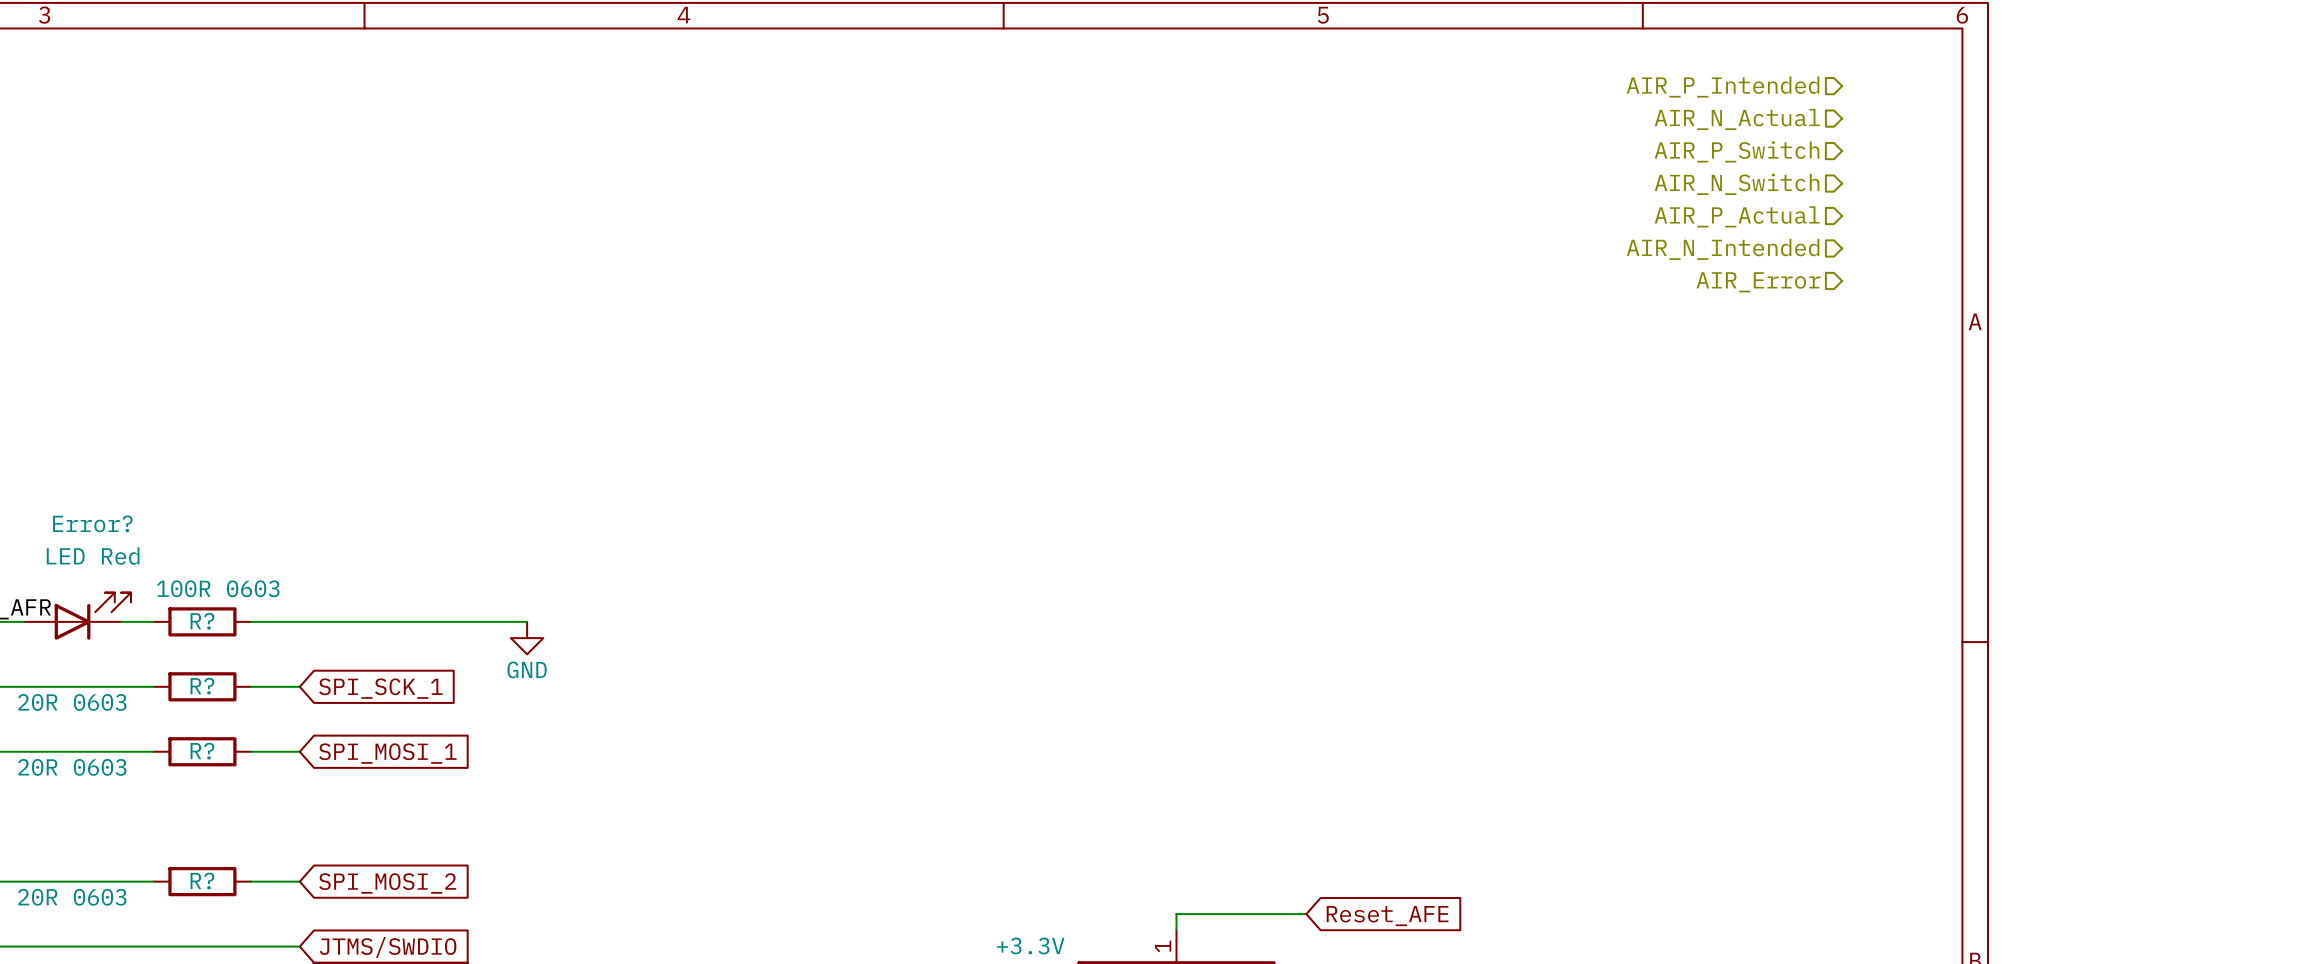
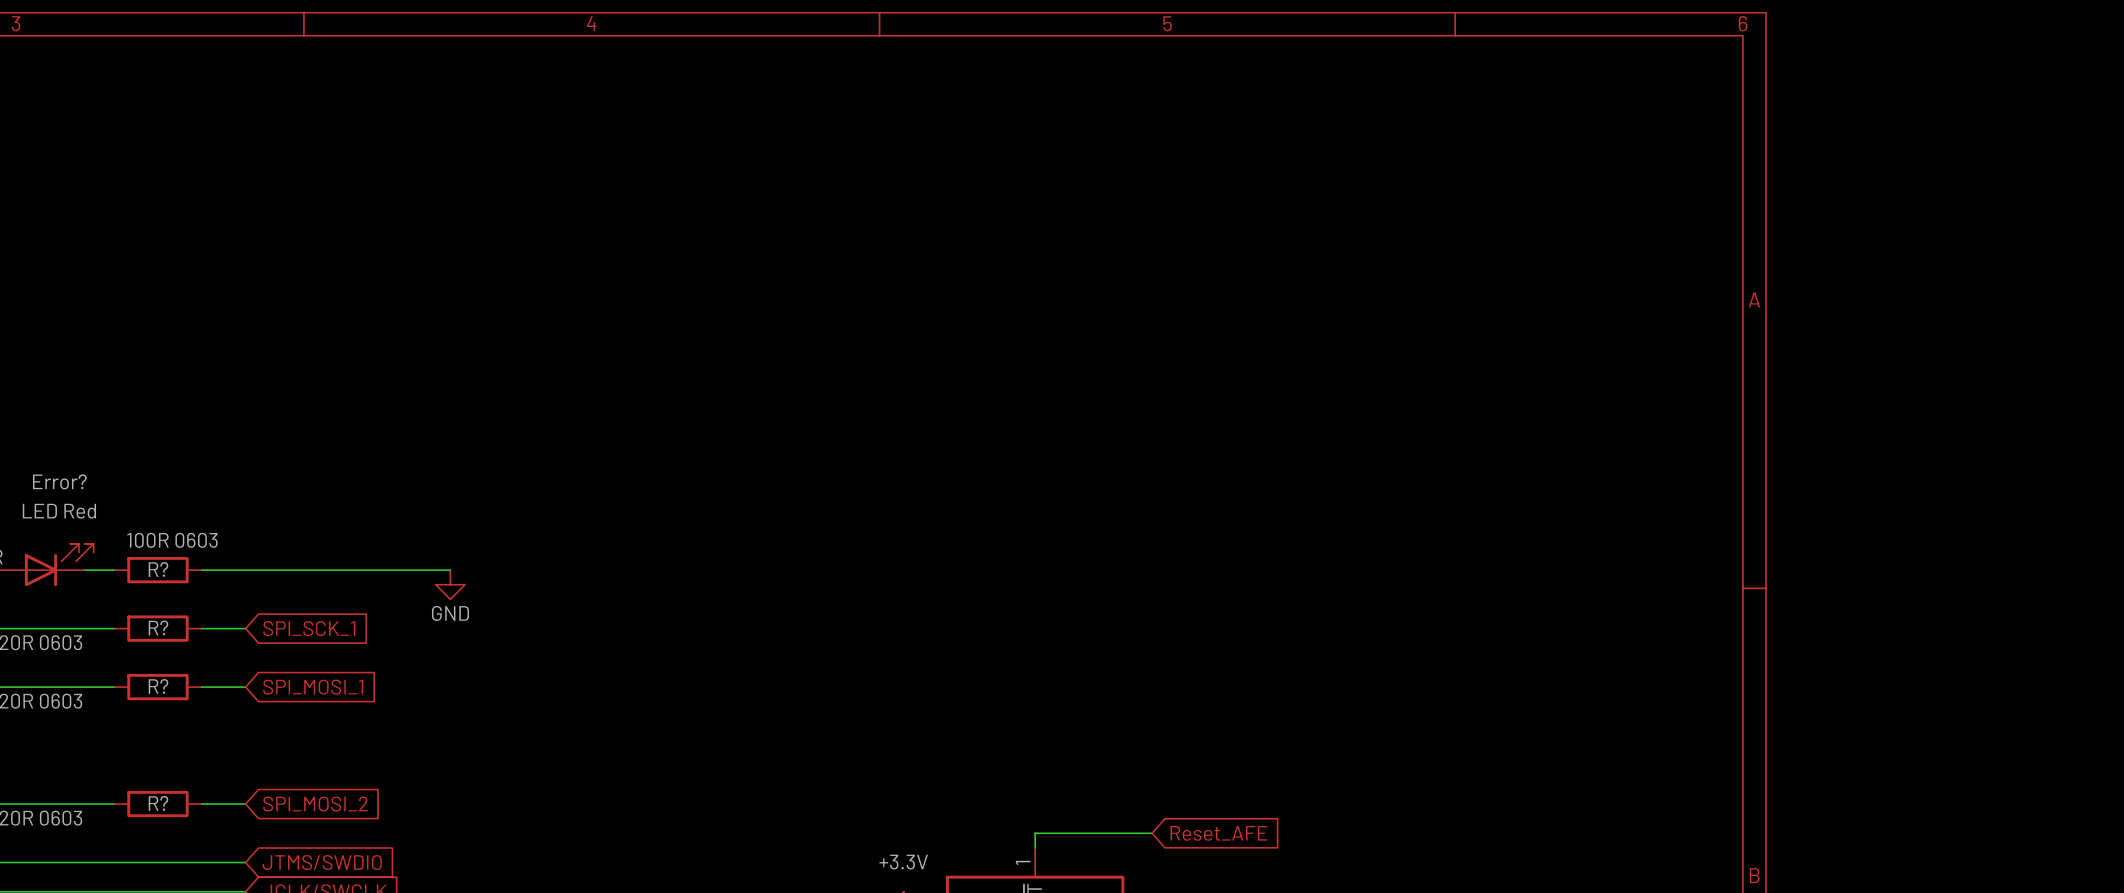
hierarchical label: AIR_P_Intended (1723, 87) -> none
hierarchical label: AIR_N_Actual (1737, 119) -> none
hierarchical label: AIR_P_Switch (1737, 151) -> none
hierarchical label: AIR_N_Switch (1737, 184) -> none
hierarchical label: AIR_P_Actual (1737, 216) -> none
hierarchical label: AIR_N_Intended (1723, 249) -> none
hierarchical label: AIR_Error (1758, 282) -> none

